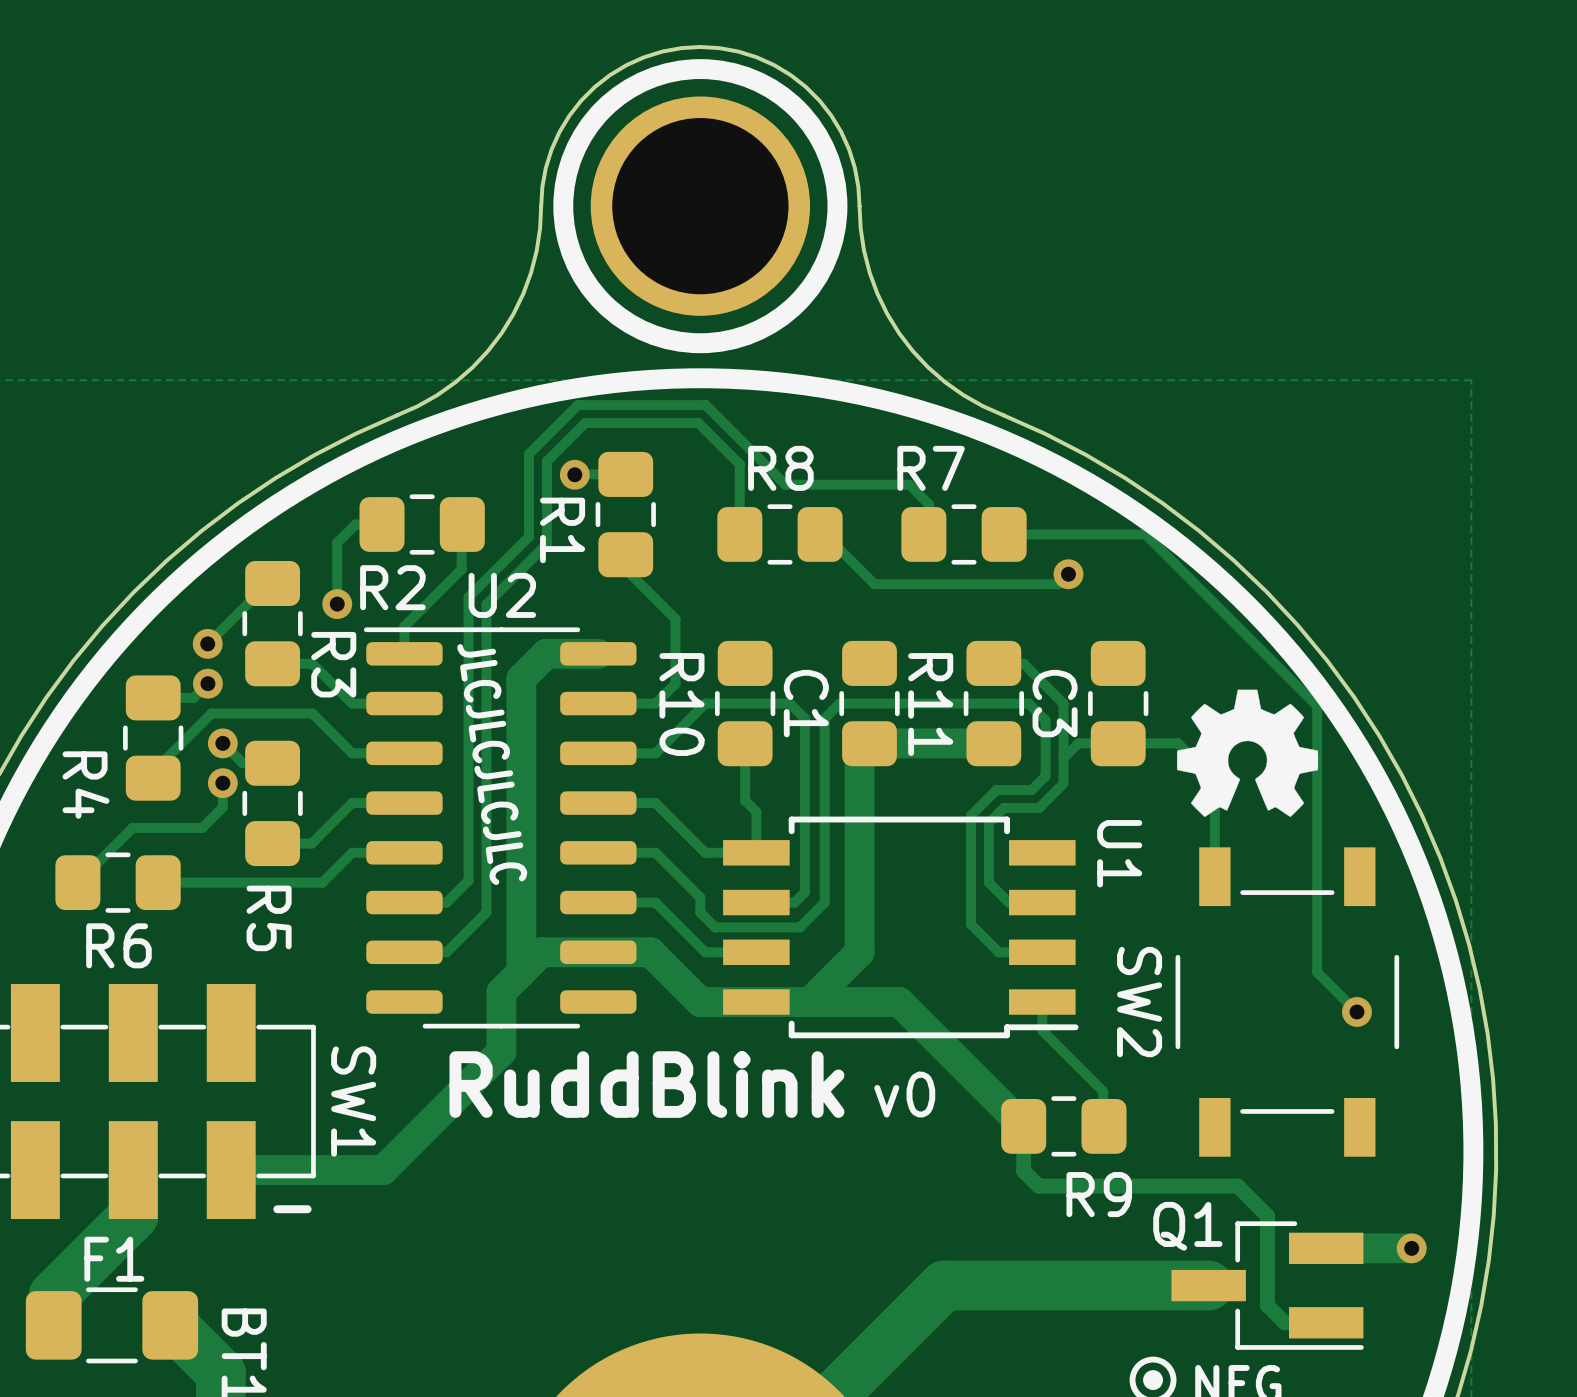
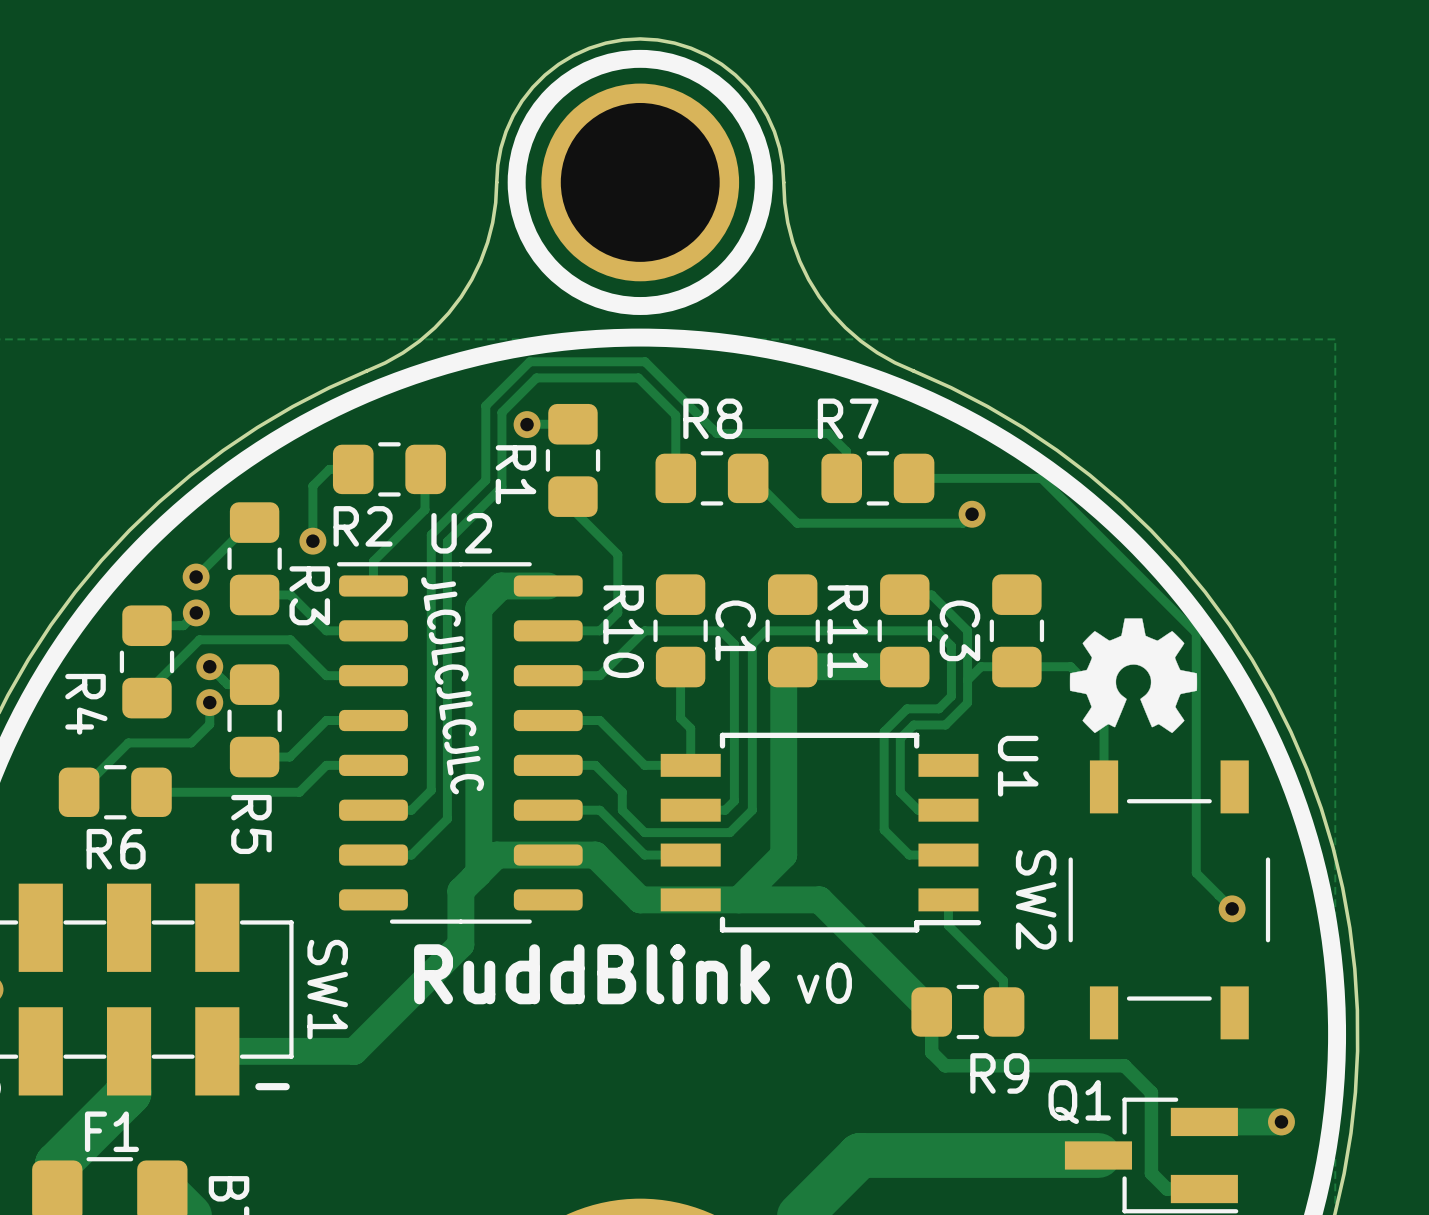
track: (650, 852) (655, 852) (700, 897) (700, 912) (715, 927) -> (595, 765) (622, 792) (622, 810) (644, 832) (653, 832)

